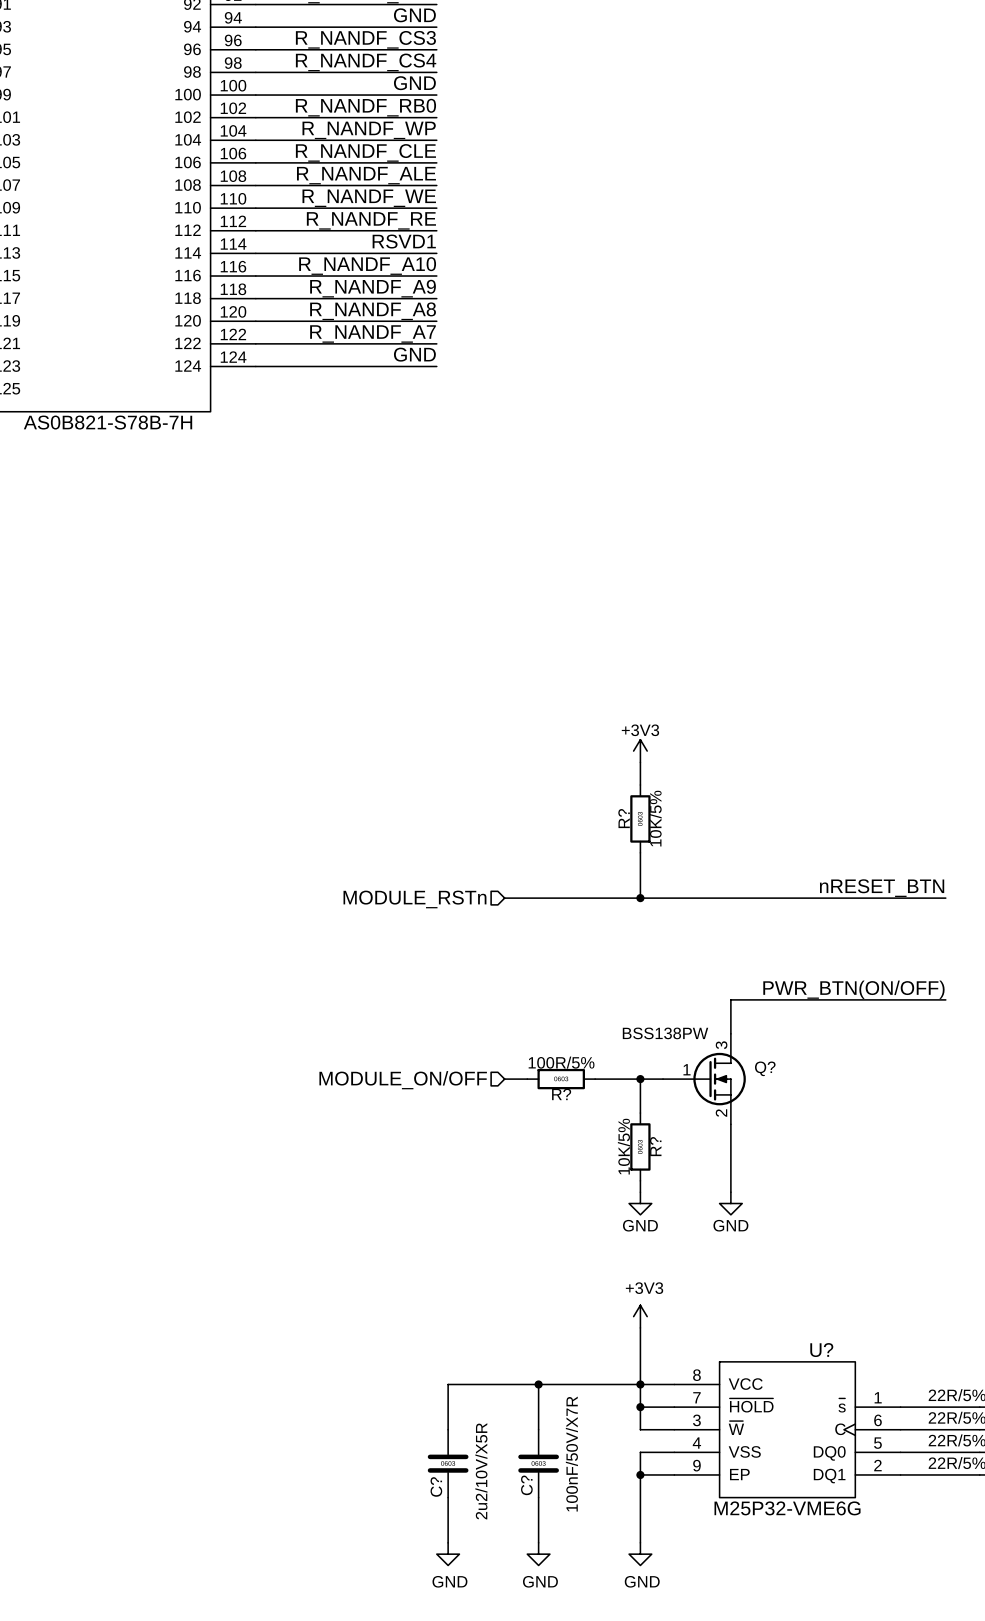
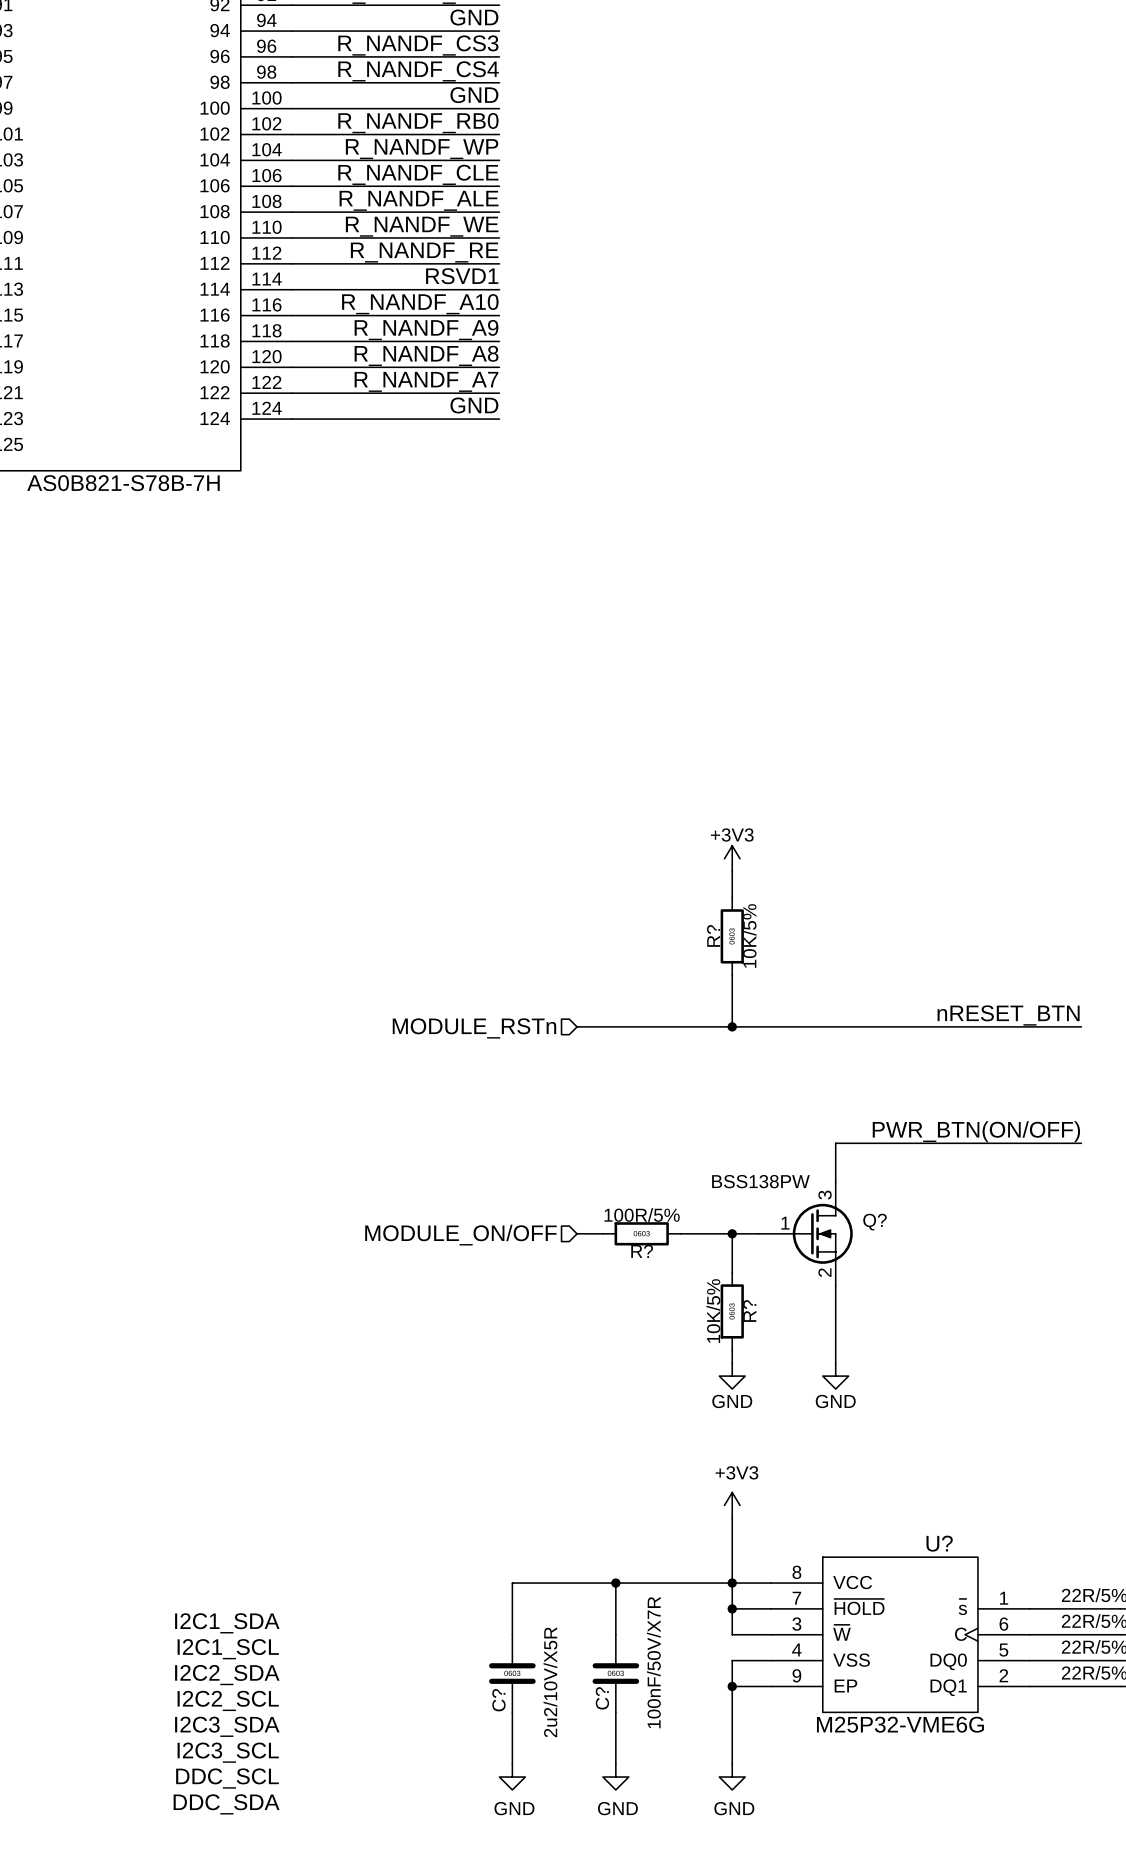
label: none -> I2C1_SDA (227, 1623)
label: none -> I2C1_SCL (228, 1649)
label: none -> I2C2_SDA (227, 1675)
label: none -> I2C2_SCL (228, 1700)
label: none -> I2C3_SDA (227, 1726)
label: none -> I2C3_SCL (228, 1752)
label: none -> DDC_SCL (227, 1778)
label: none -> DDC_SDA (226, 1804)

